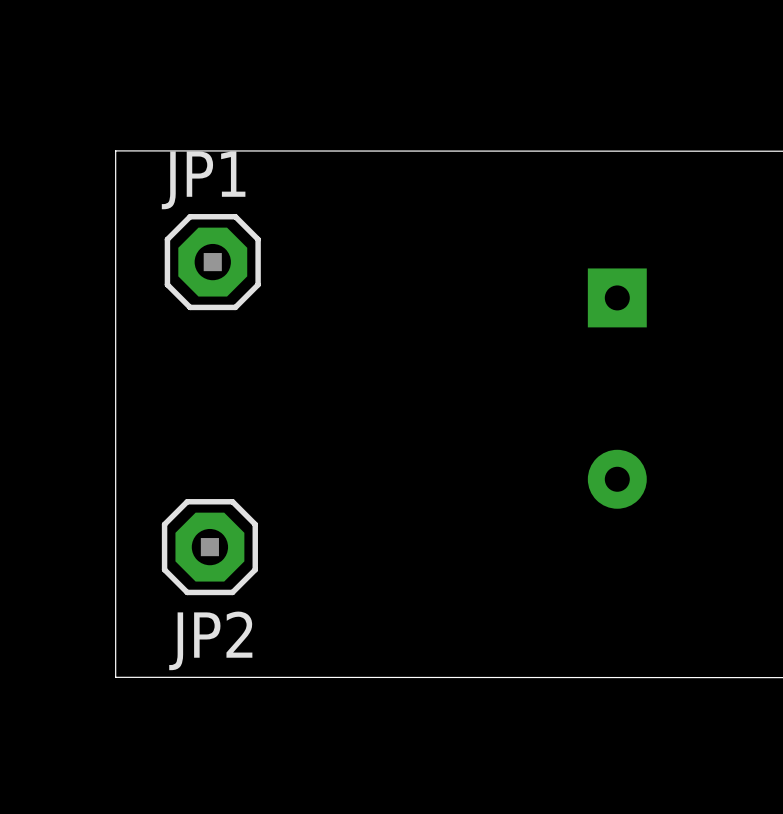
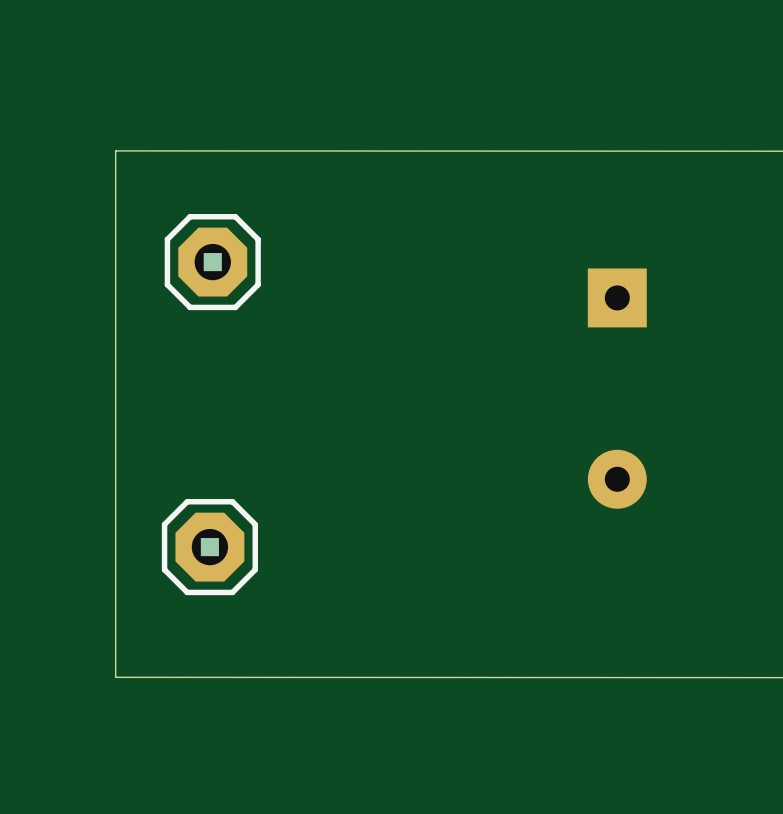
JP1 name: JP1 (203, 180) -> none
JP2 name: JP2 (210, 640) -> none

